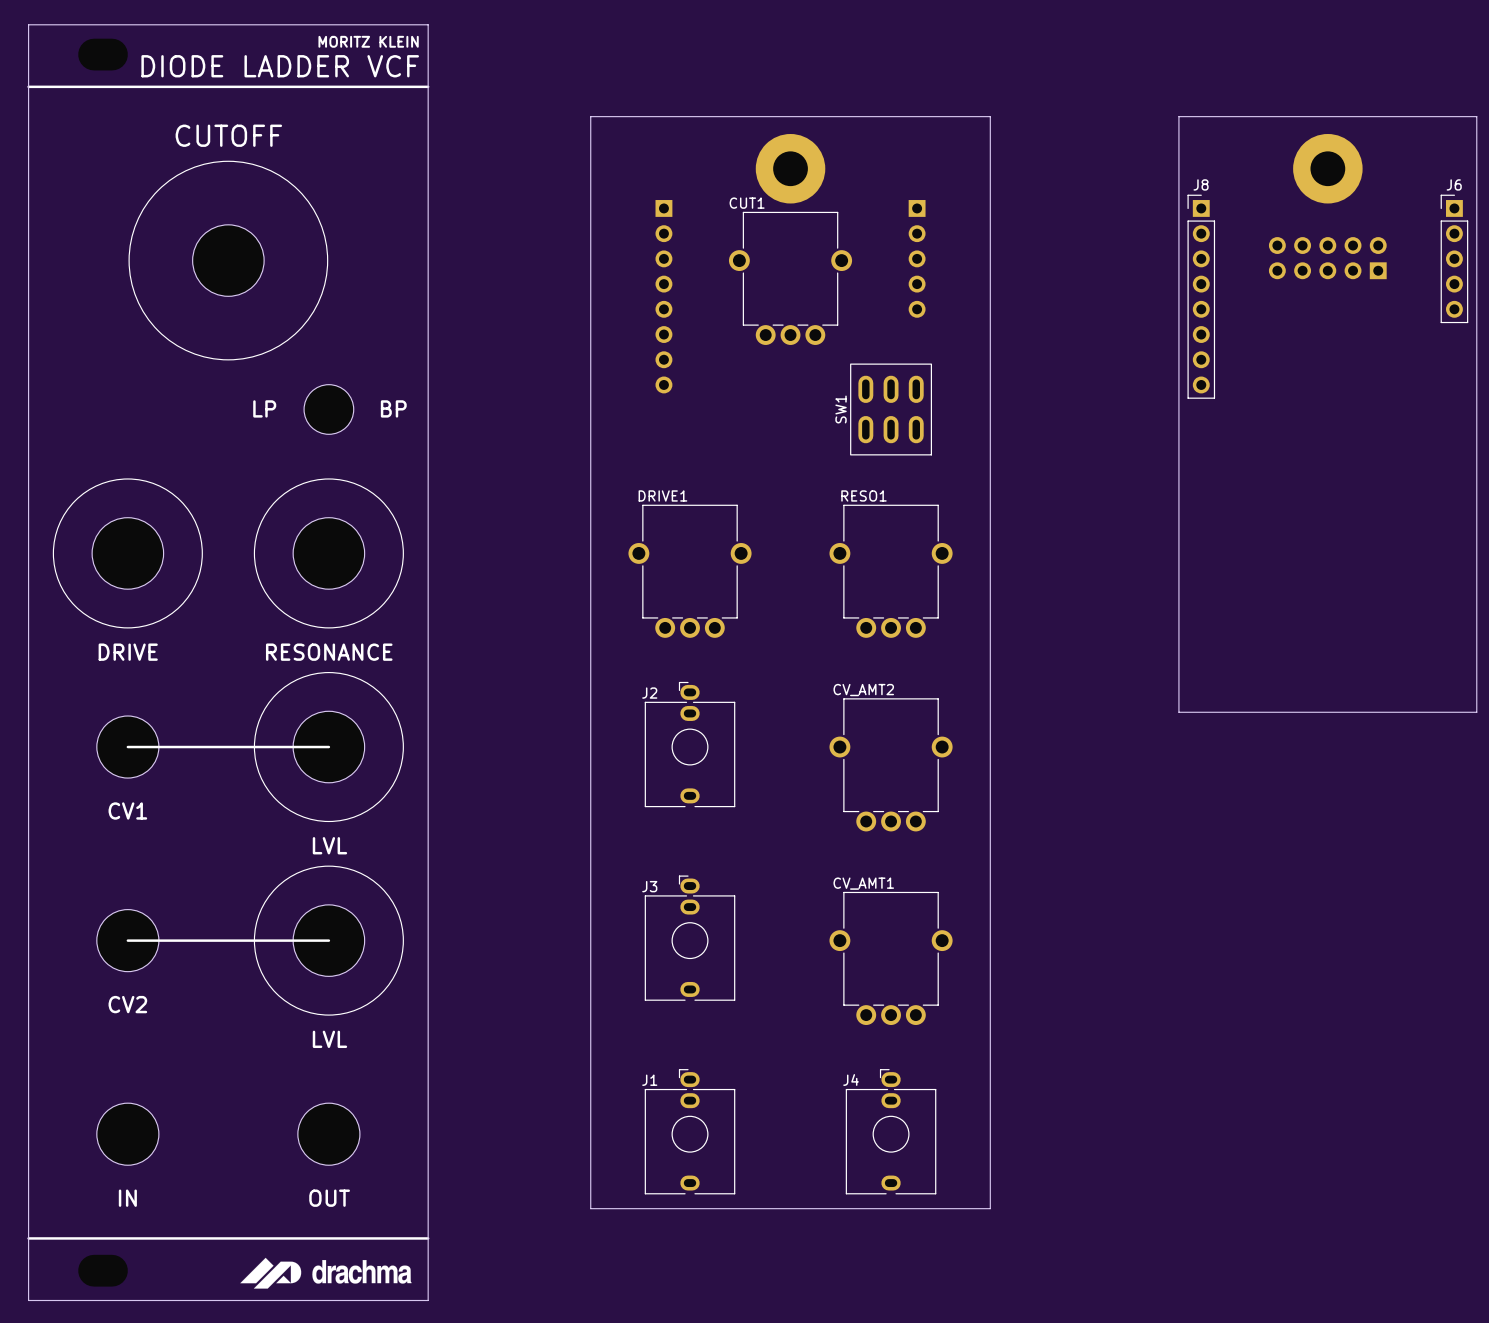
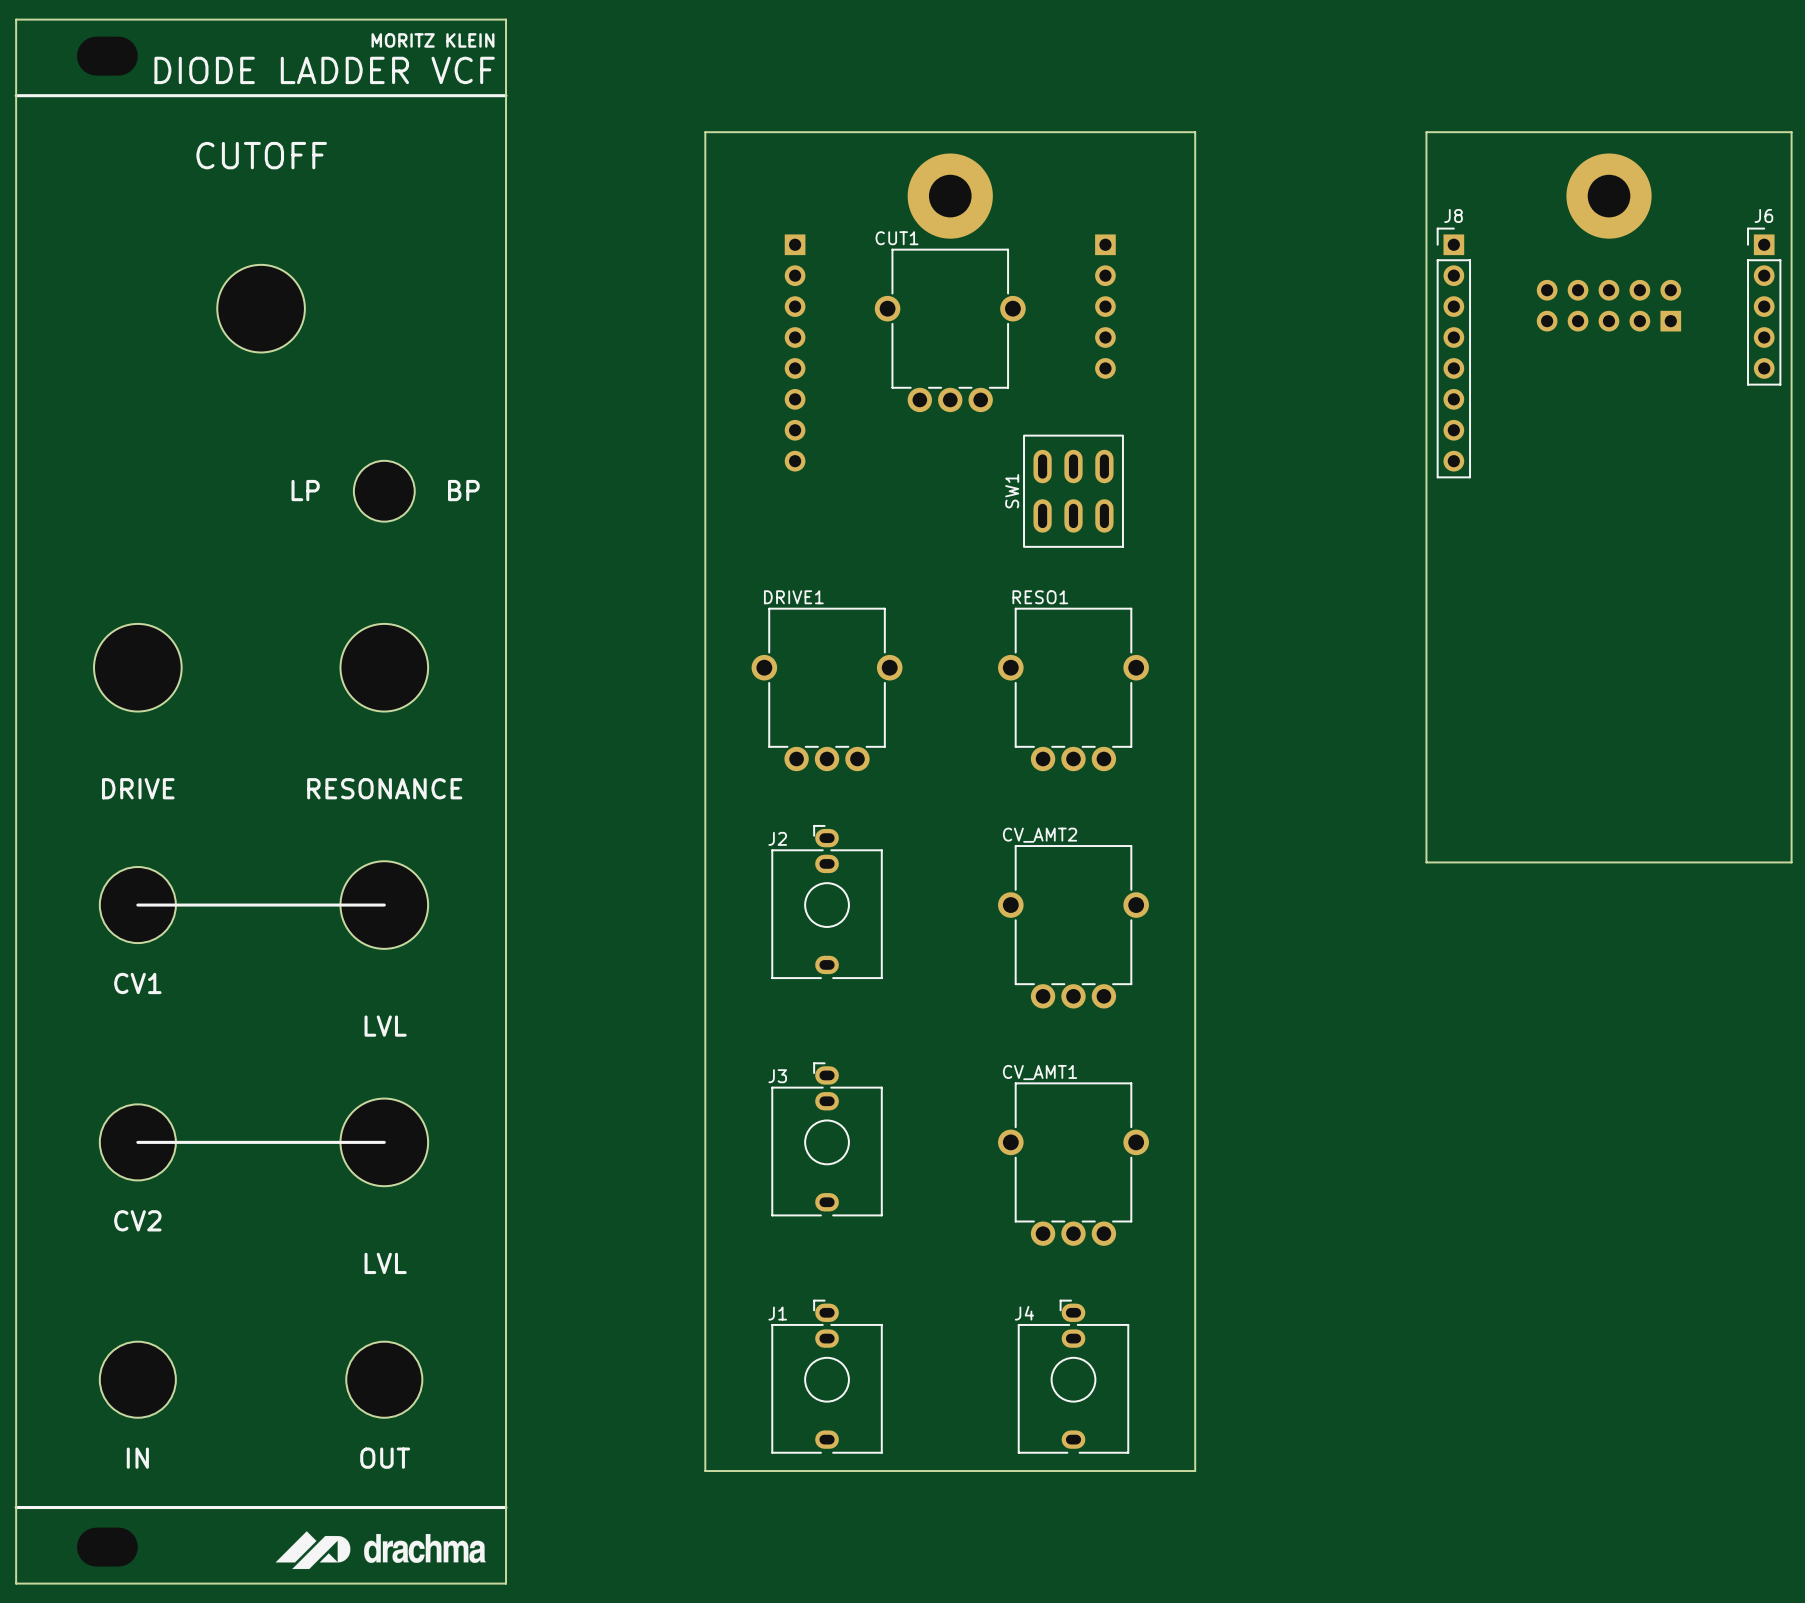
drawing: [128, 160, 329, 361] -> none
drawing: [52, 478, 203, 629] -> none
drawing: [253, 478, 404, 629] -> none
drawing: [253, 672, 404, 822] -> none
drawing: [253, 865, 404, 1016] -> none

